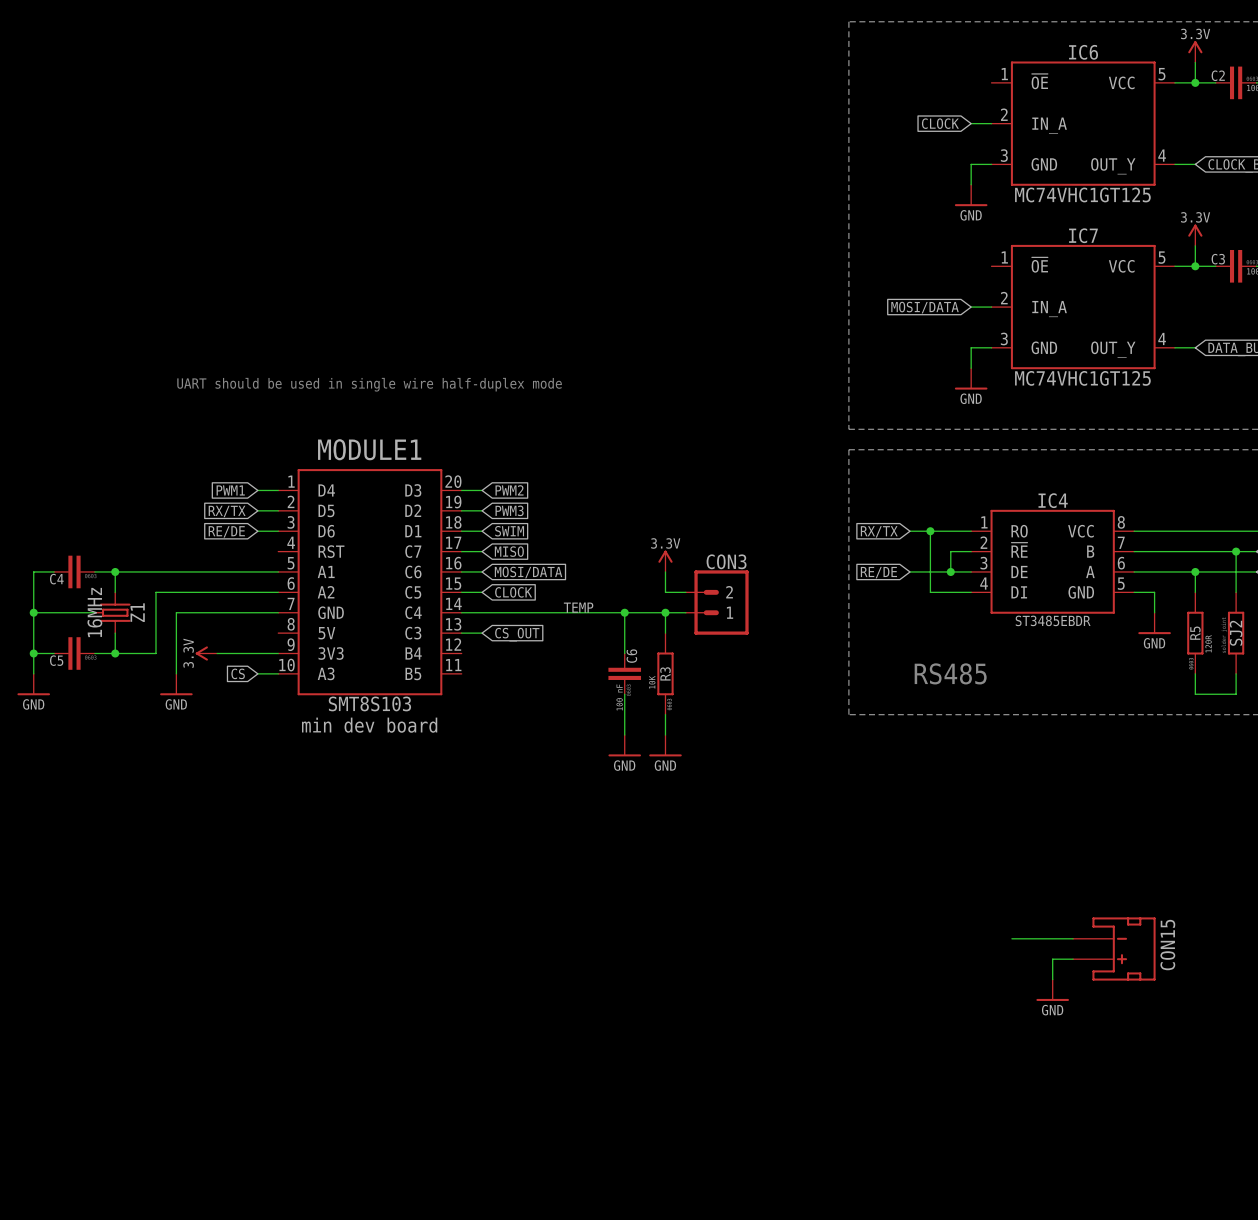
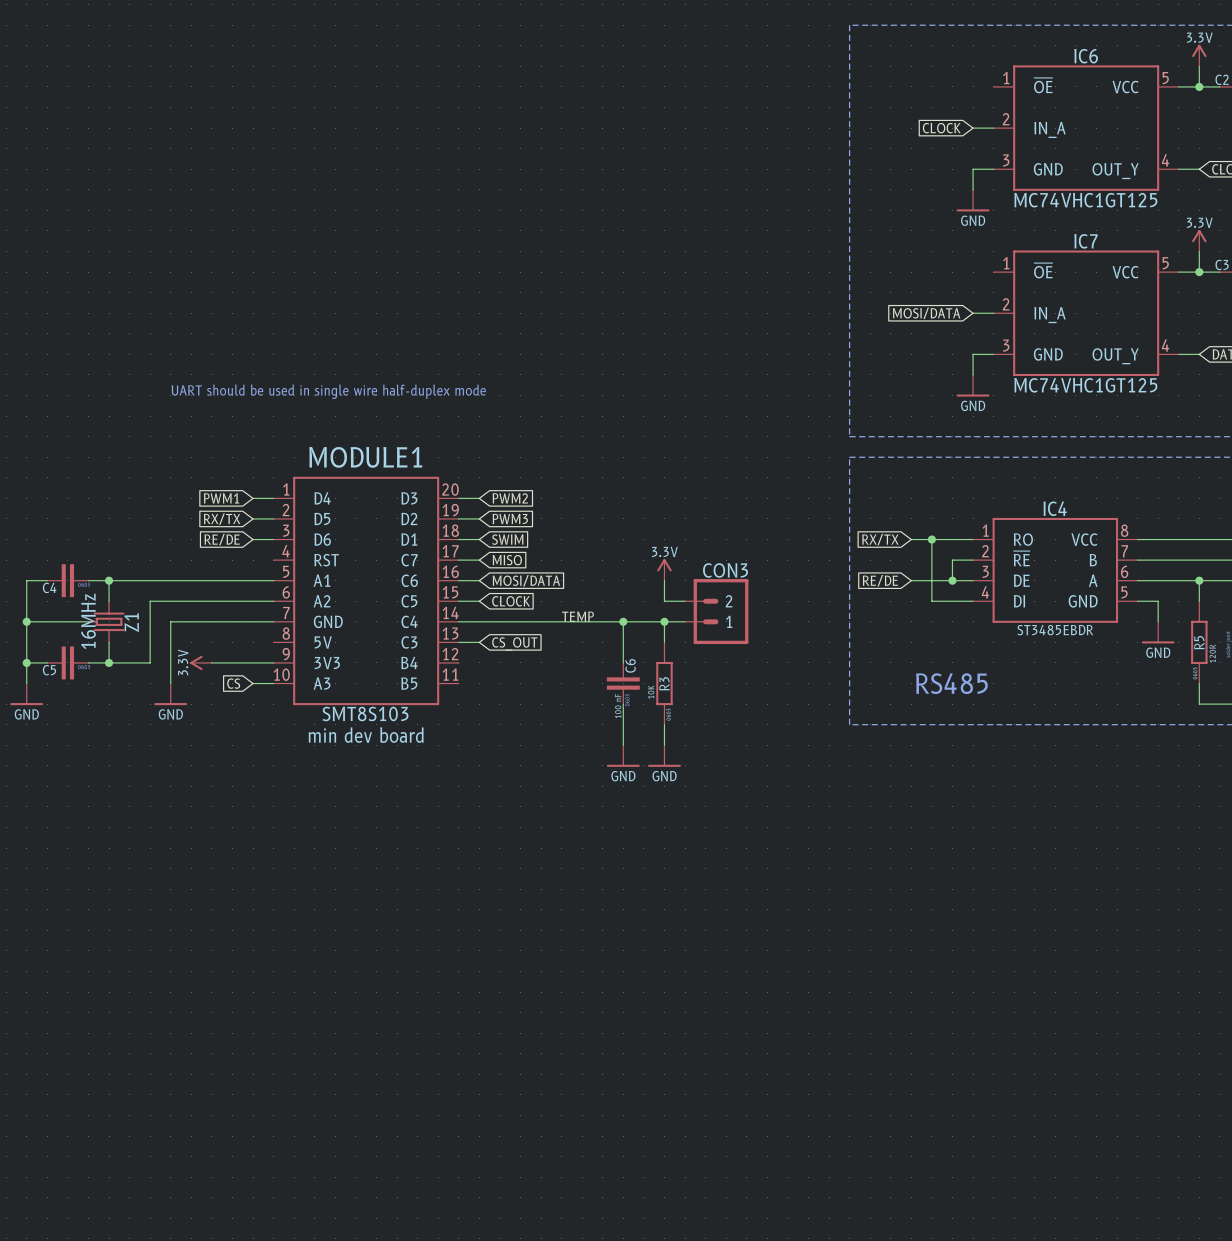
wire: (1011, 938) (1073, 938) -> none
CON15: (1114, 948) -> none
wire: (1073, 959) (1052, 959) (1052, 979) -> none
power symbol: GND (1052, 990) -> none

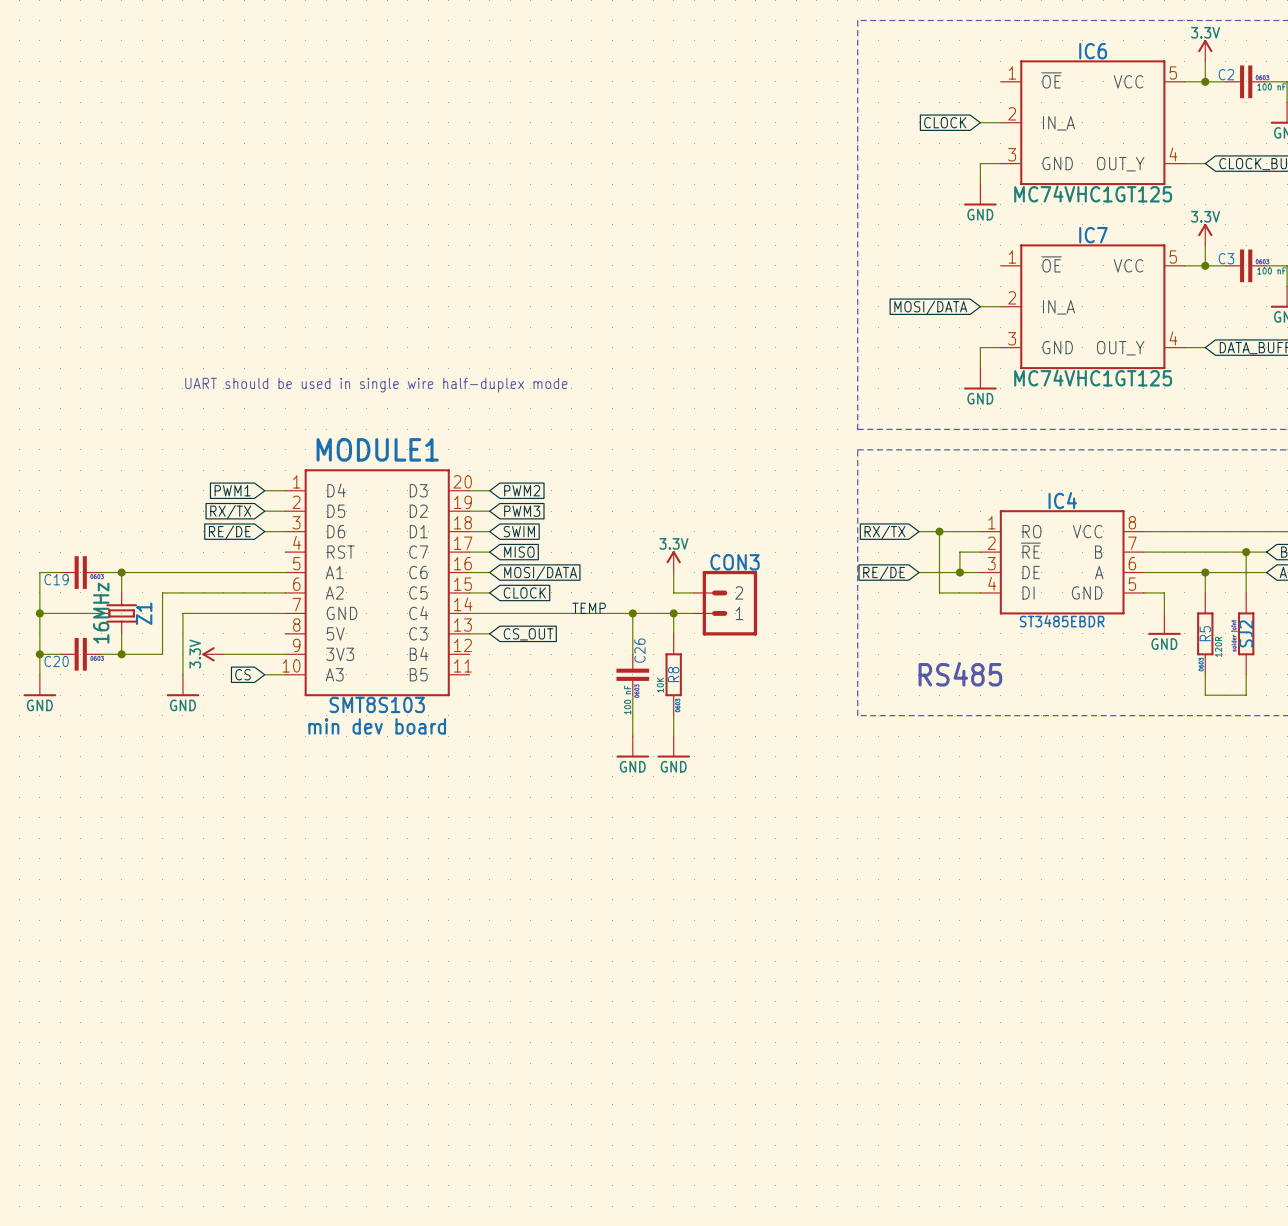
C4 name: C4 (49, 587) -> C19 (56, 579)
C6 name: C6 (630, 665) -> C26 (639, 650)
C5 name: C5 (49, 670) -> C20 (56, 661)
R3 name: R3 (664, 683) -> R8 (673, 674)

